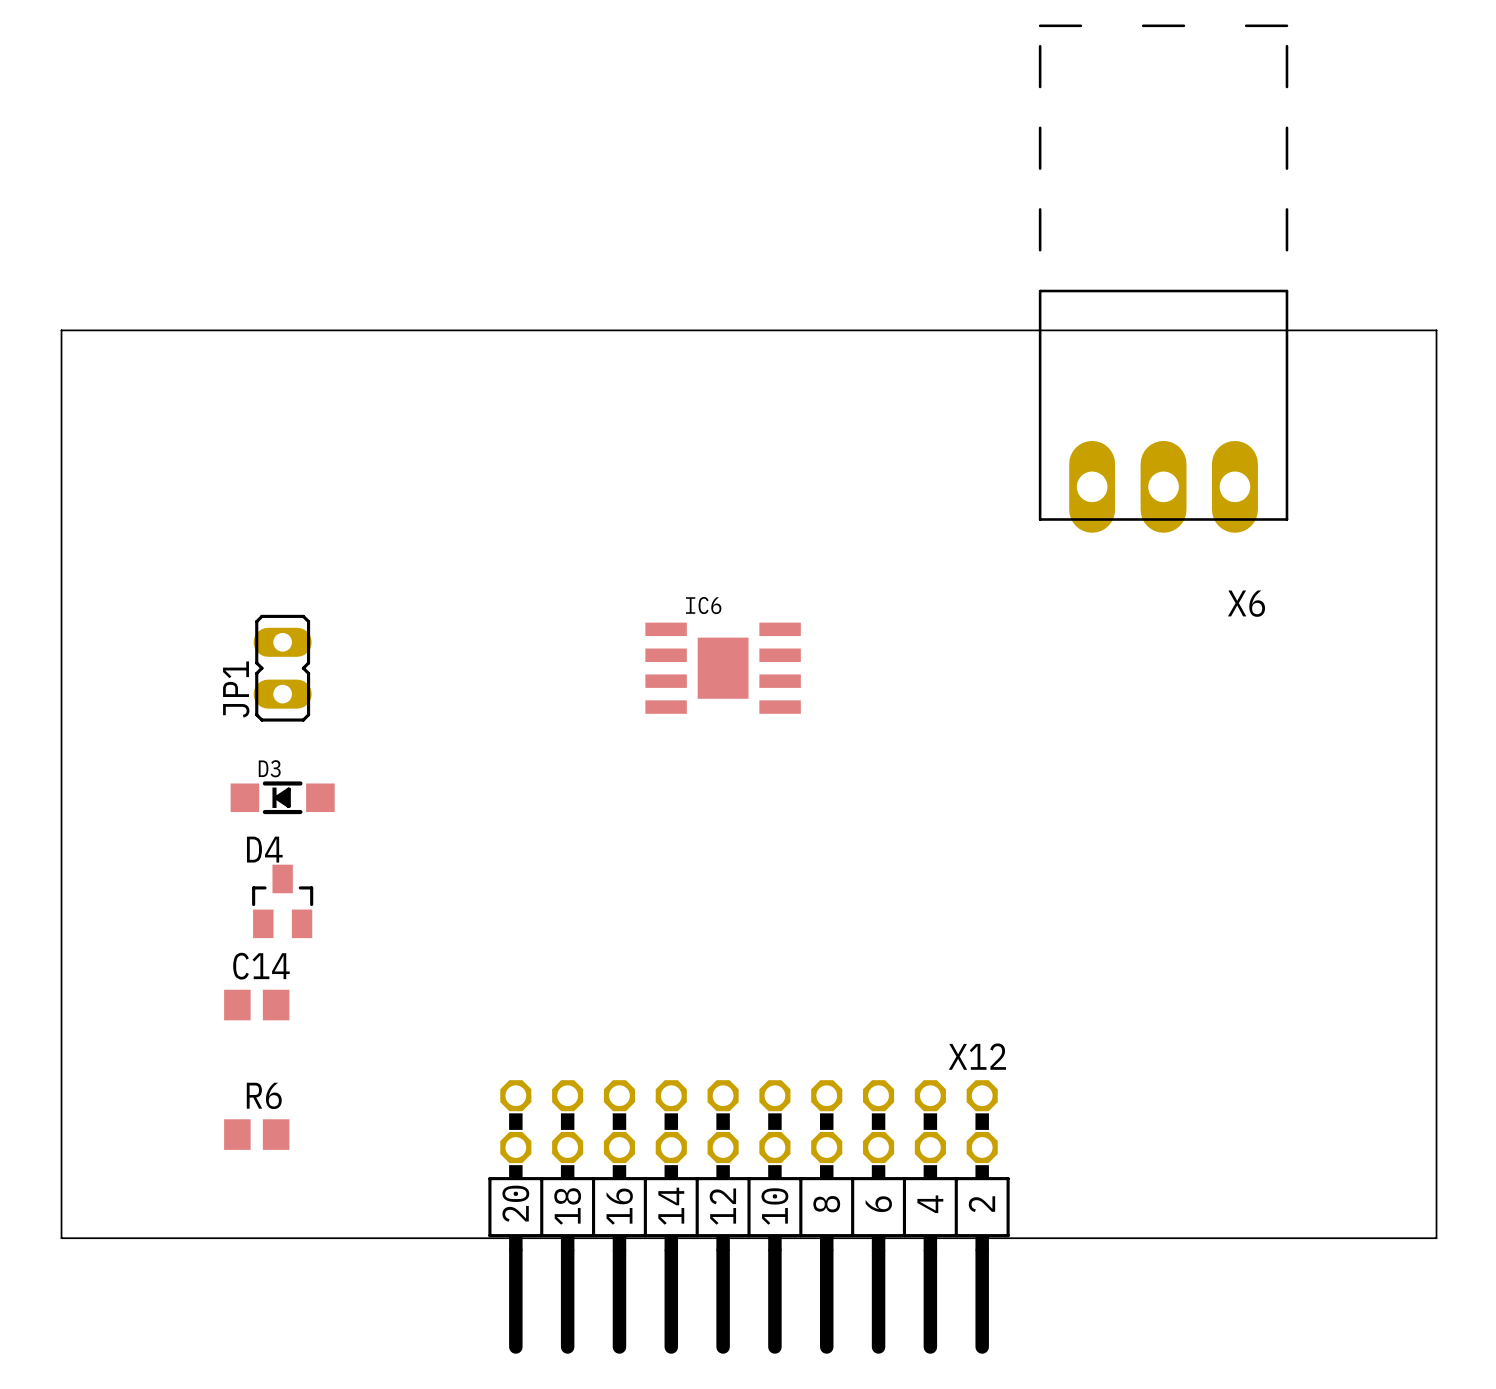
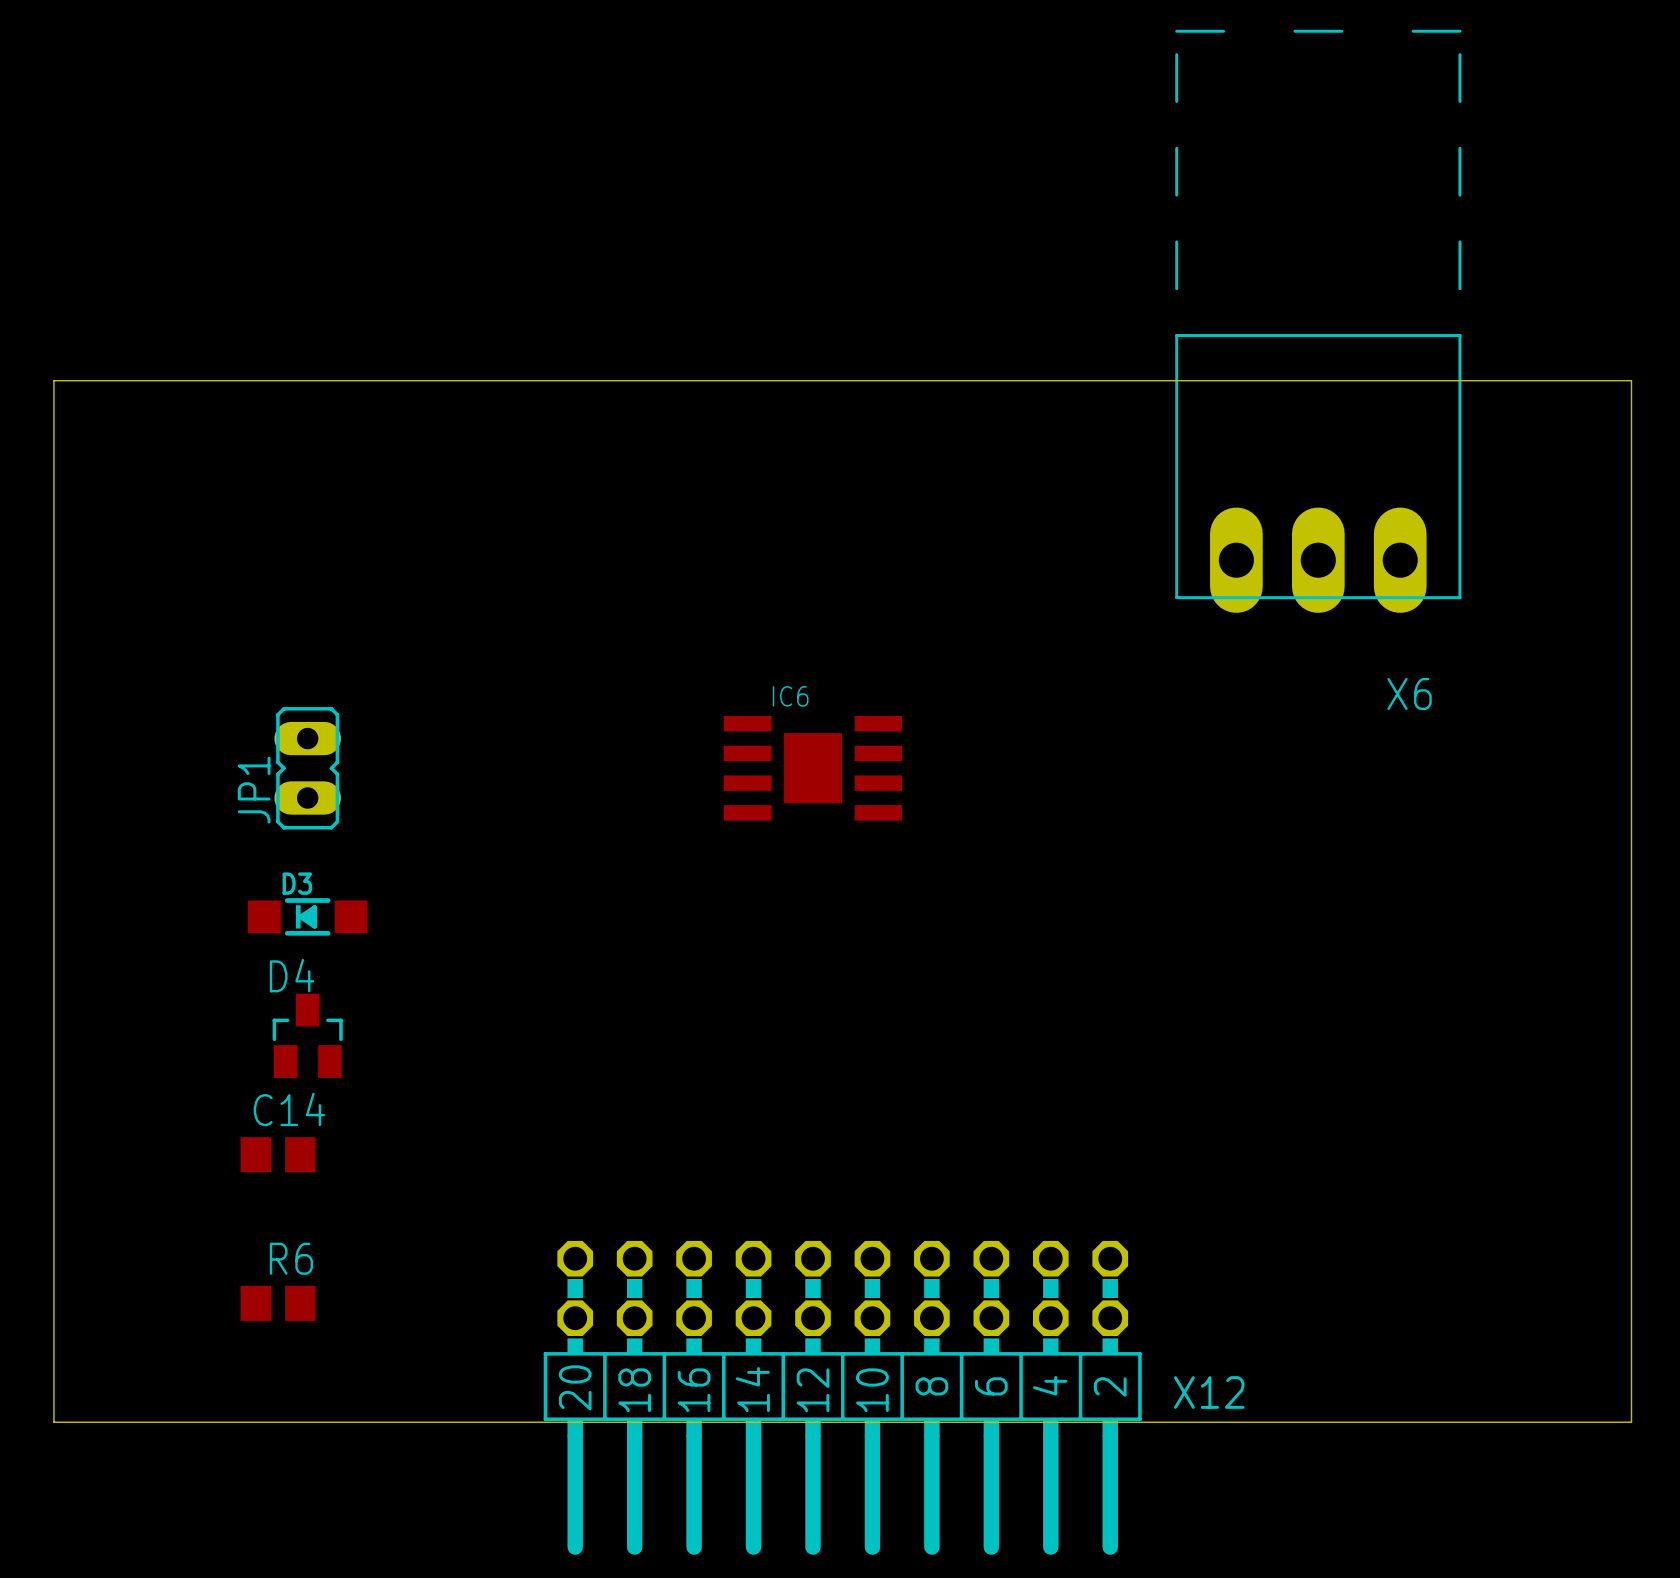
X12 name position: X12 (977, 1056) -> X12 (1209, 1392)

